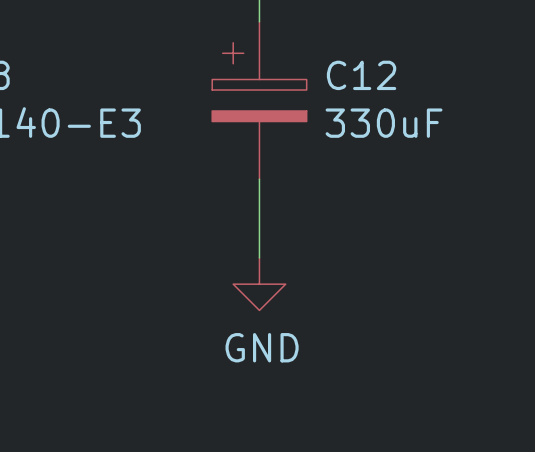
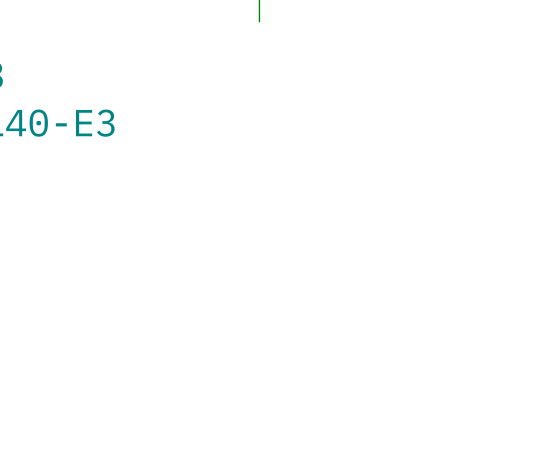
C12: 330uF (259, 100) -> none
wire: (259, 179) (259, 257) -> none
power symbol: GND (259, 284) -> none

